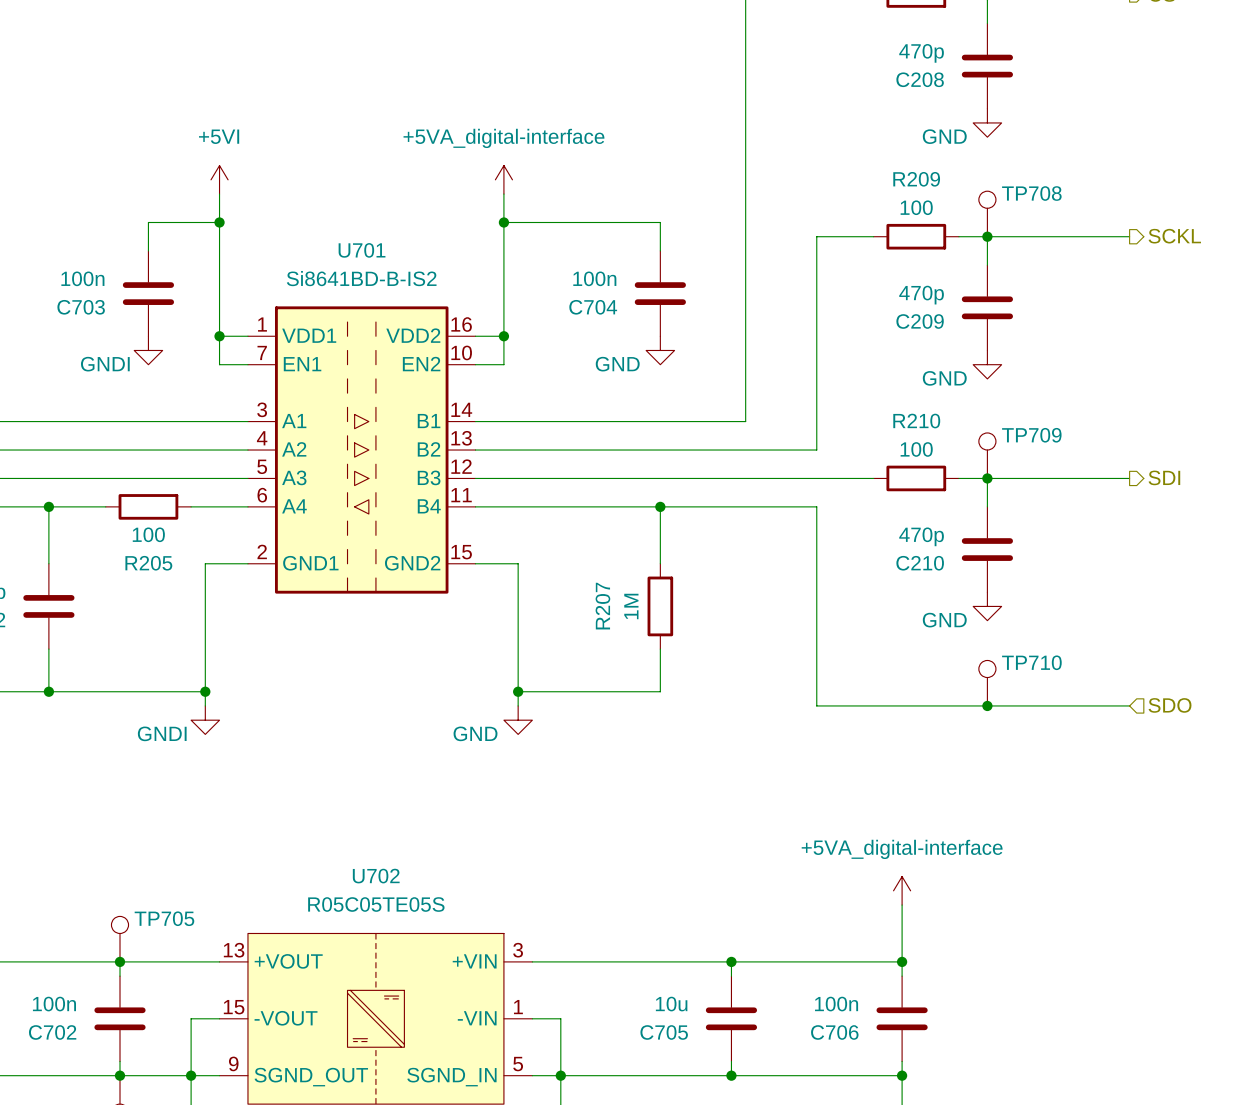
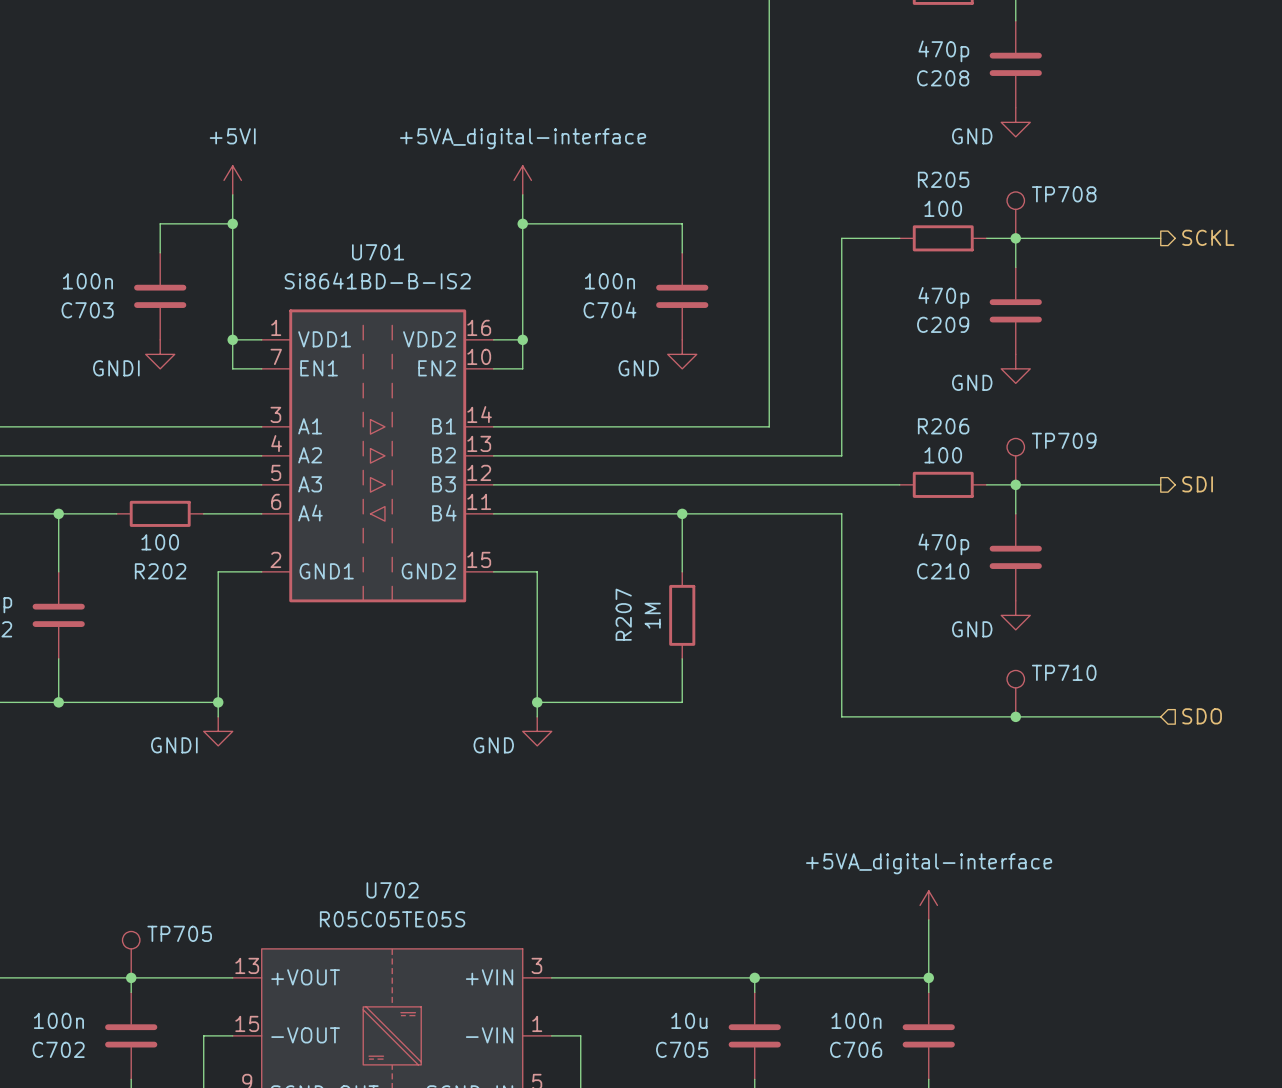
R209 name: R209 (916, 179) -> R205 (943, 179)
R210 name: R210 (916, 421) -> R206 (943, 426)
R205 name: R205 (148, 563) -> R202 (160, 571)

